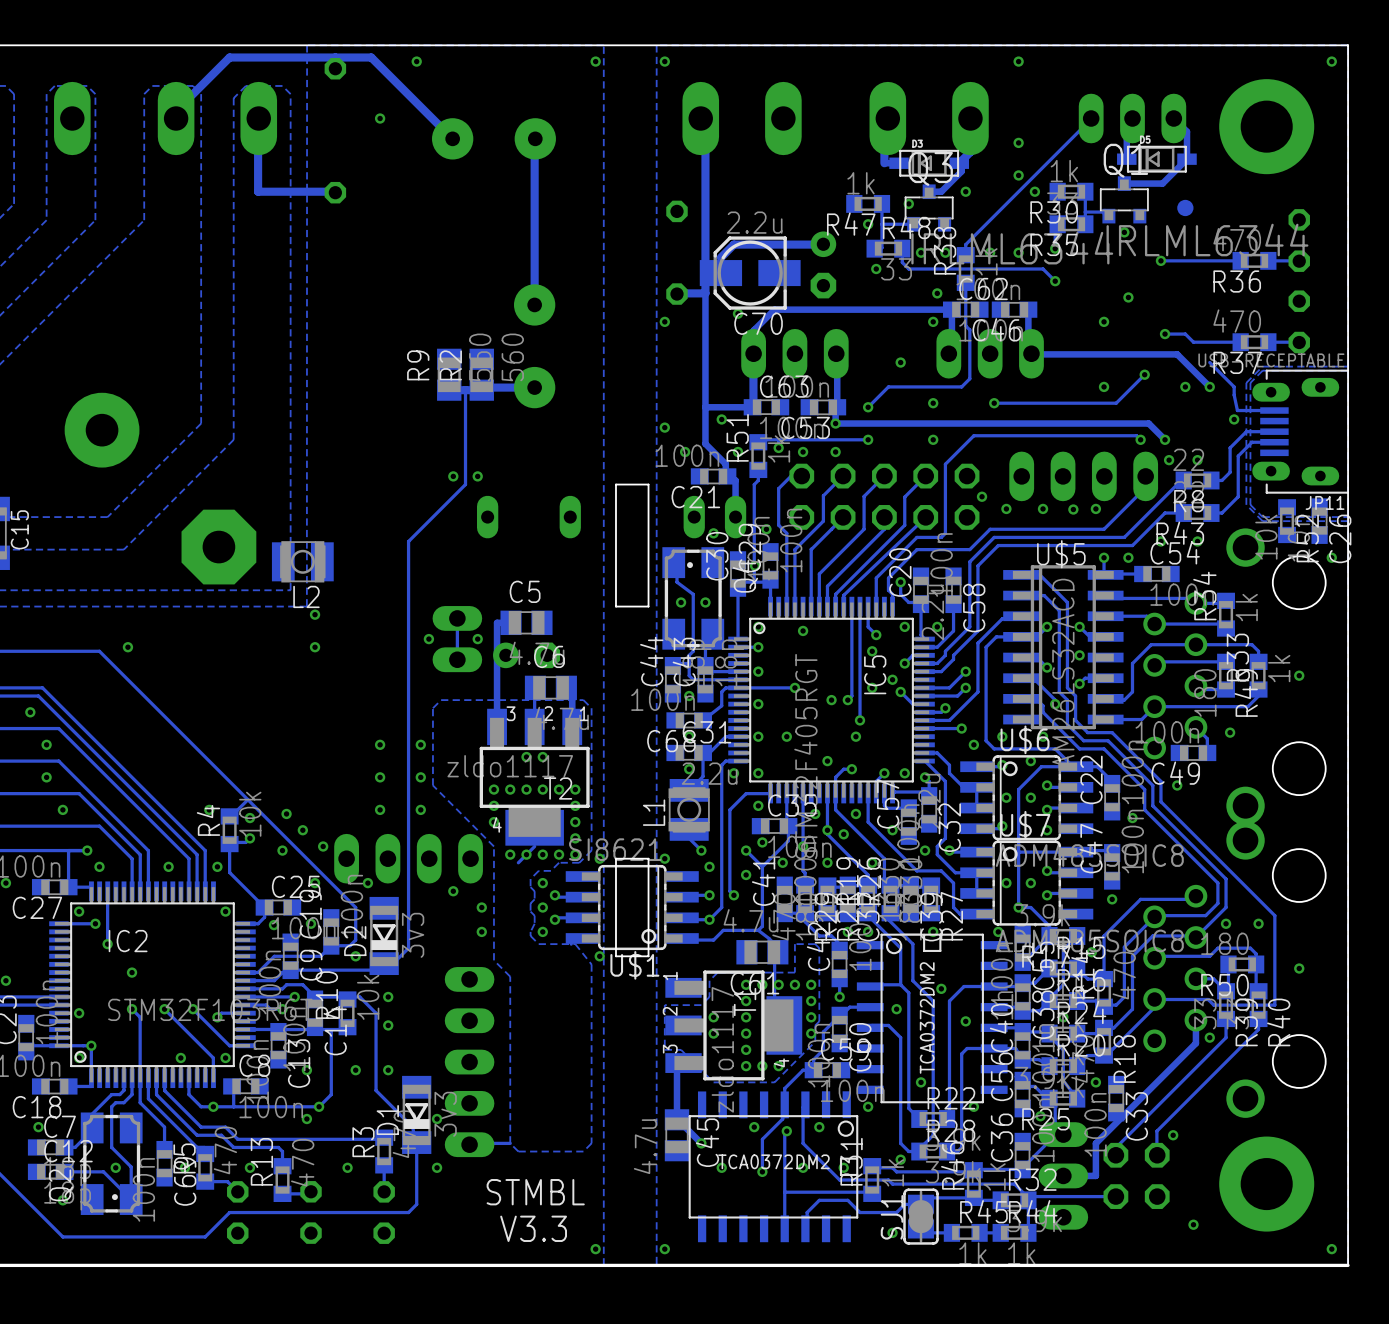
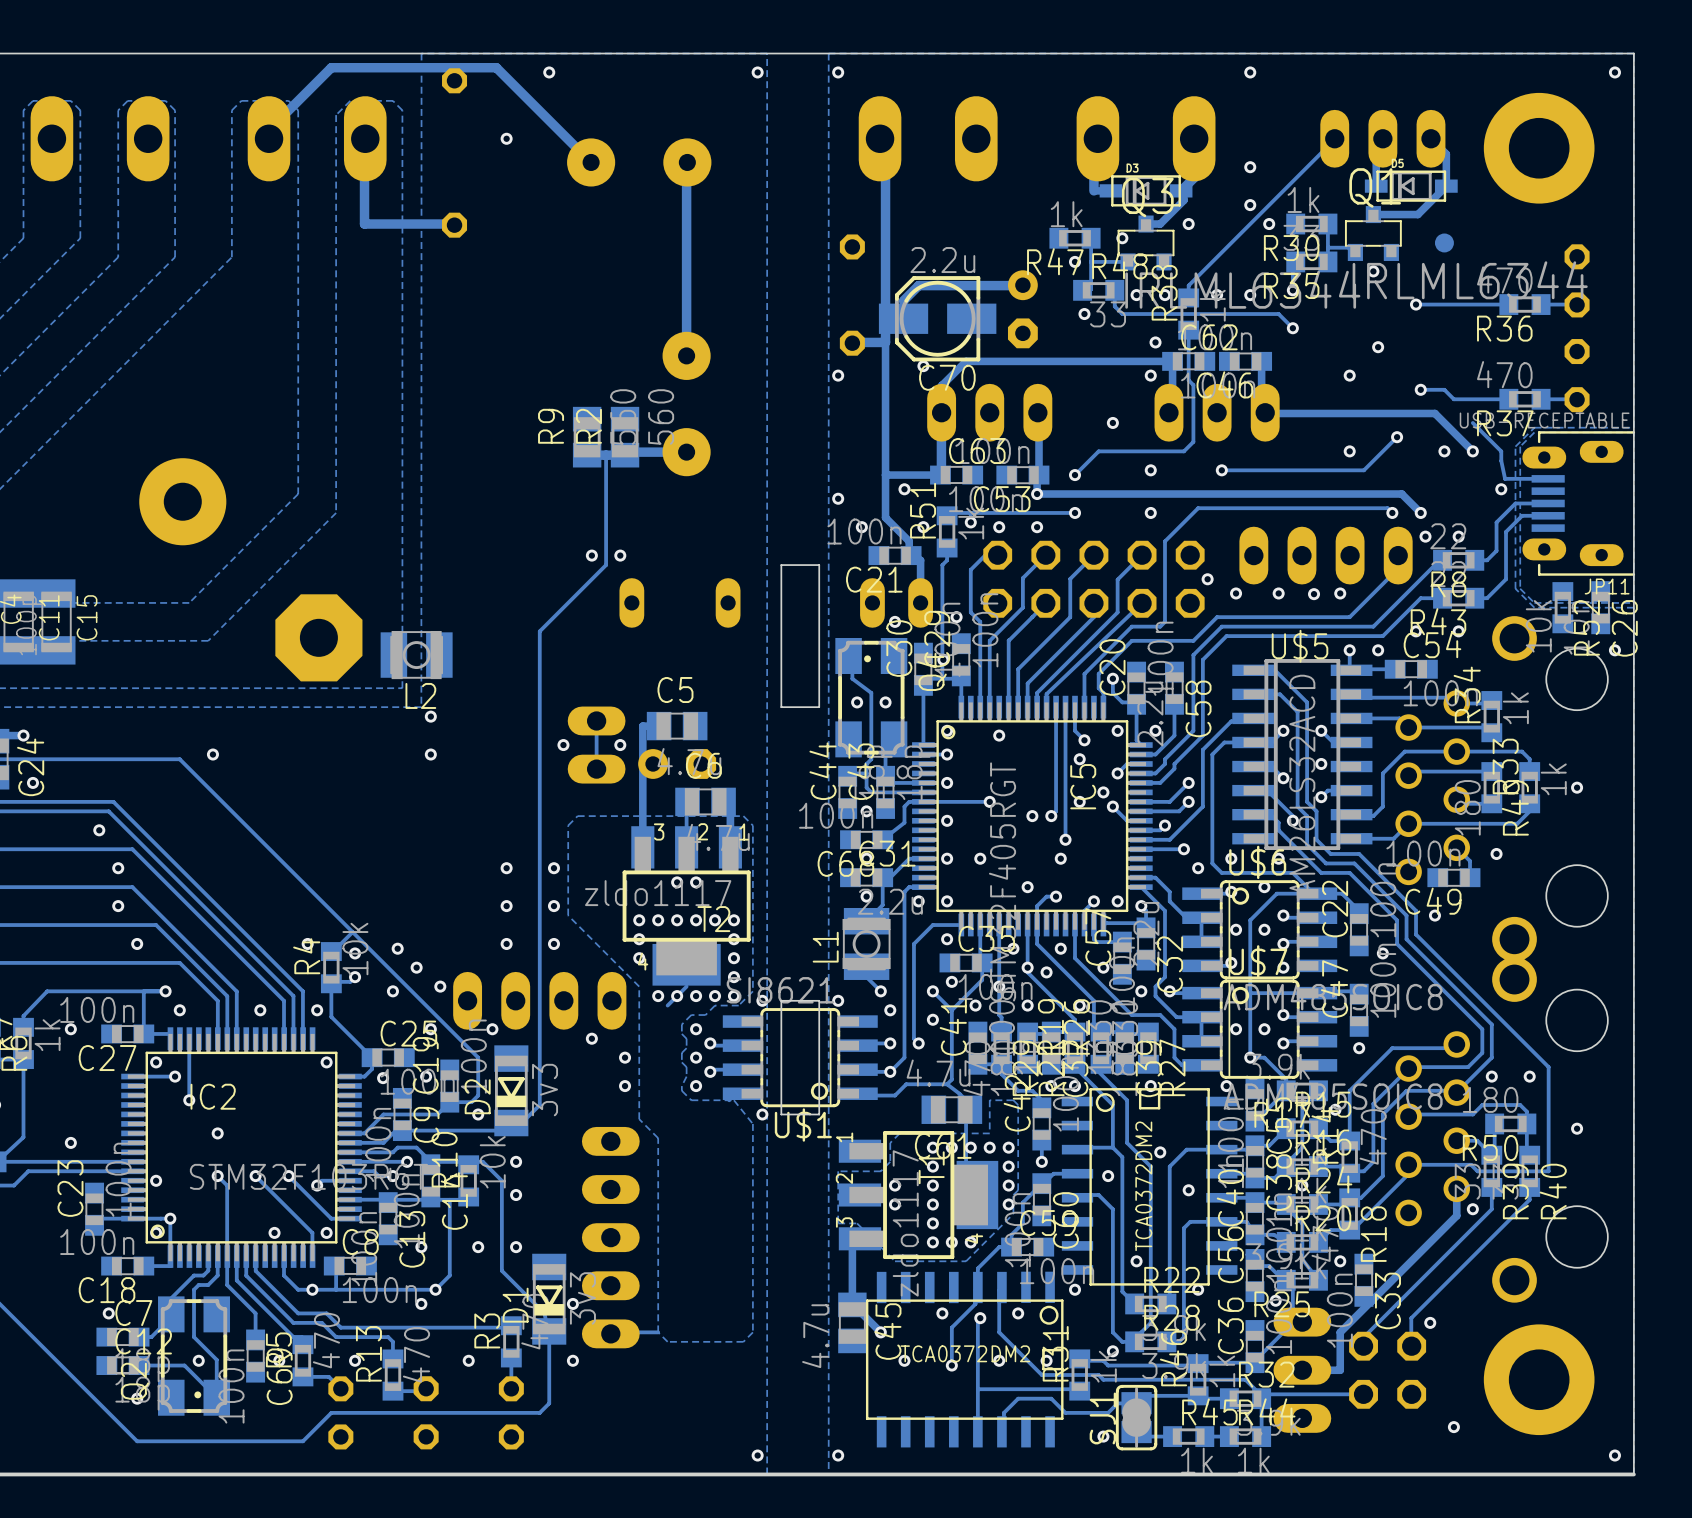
text: STMBL (535, 1192) -> none
text: V3.3 (533, 1228) -> none

